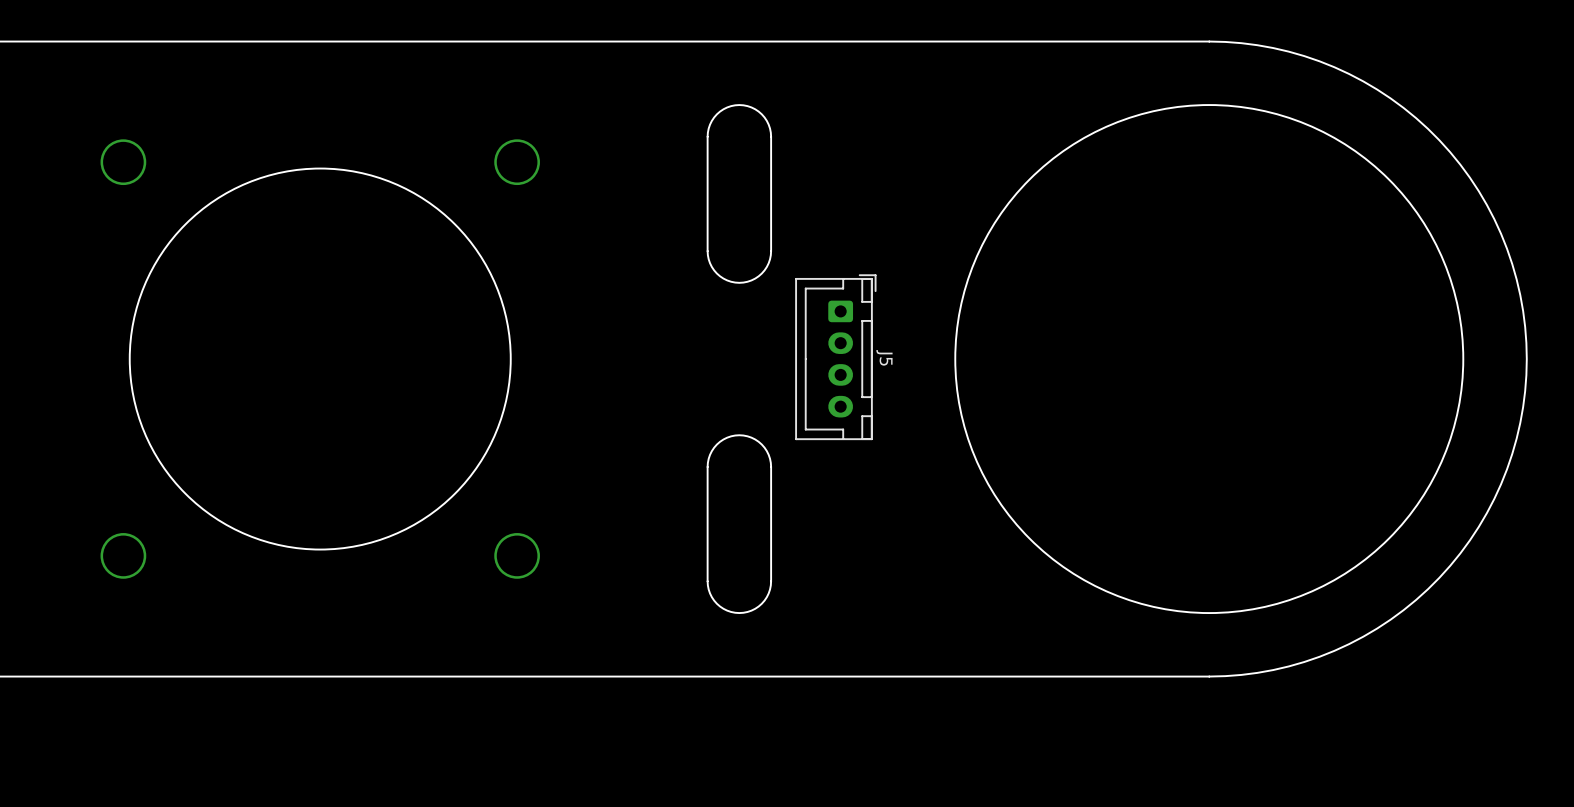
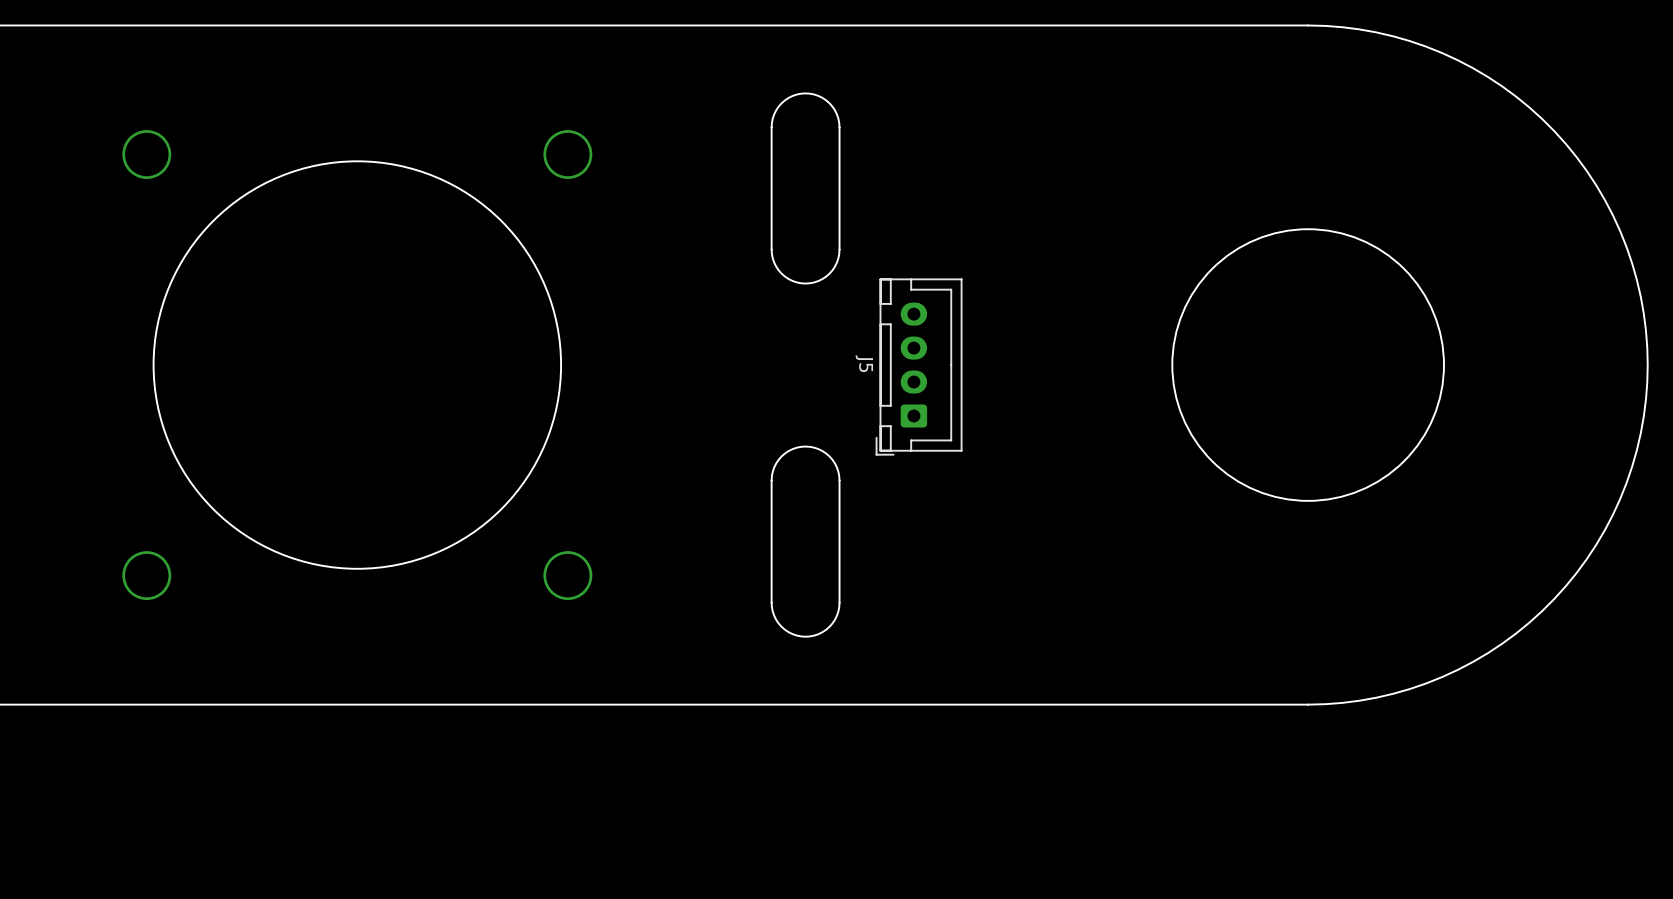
round board edge size: [954, 104, 1464, 614] -> [1171, 228, 1445, 502]
J5 rotation: 0° (835, 357) -> 180° (919, 367)

